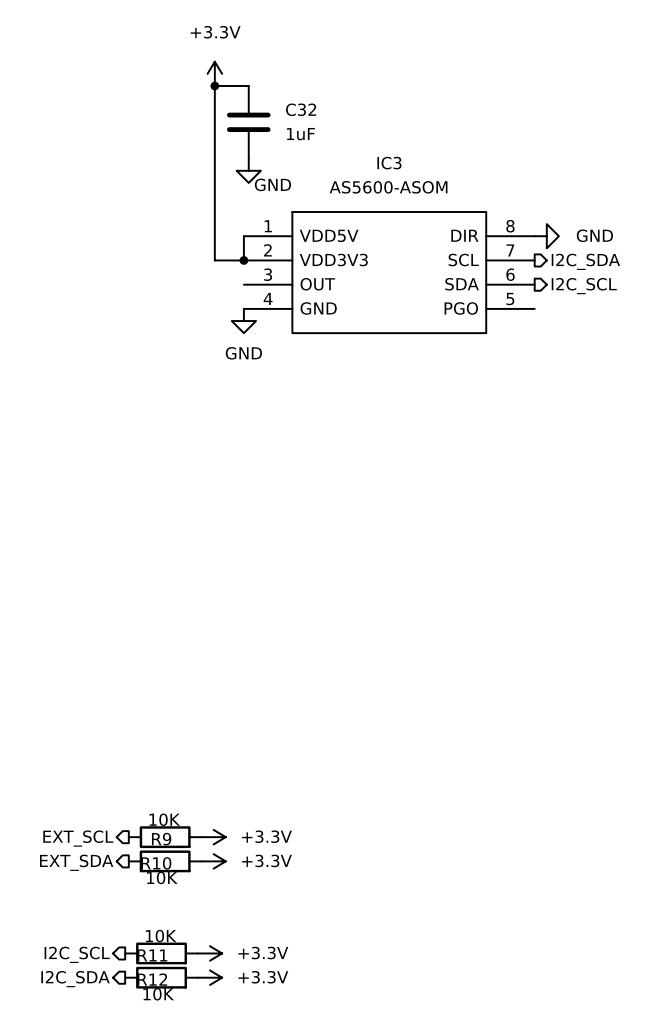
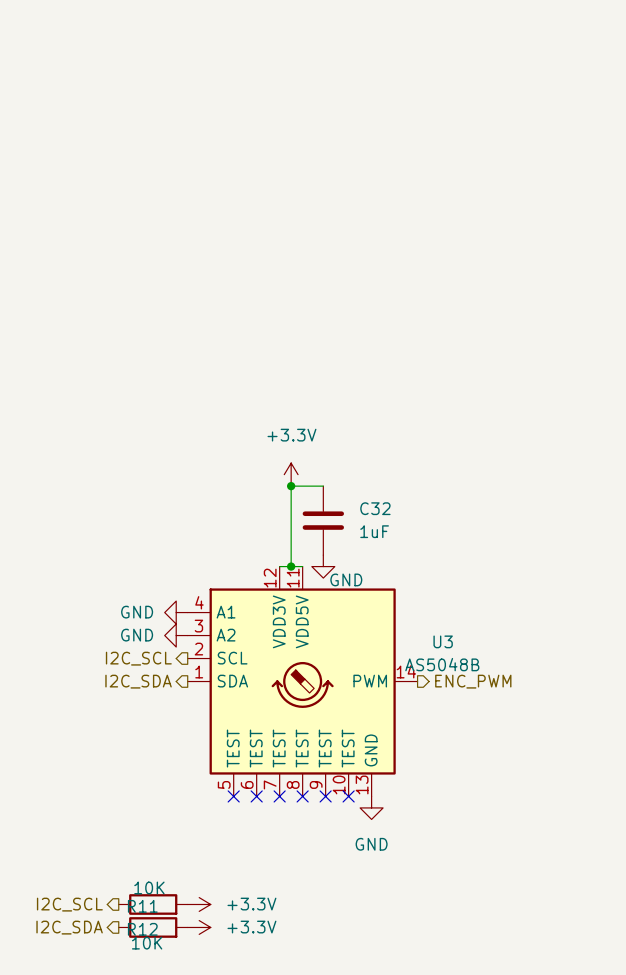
power symbol: +3.3V (214, 73) -> none
junction: (214, 85) -> none
wire: (248, 85) (214, 85) (214, 260) (243, 260) (243, 236) -> none
C32 position: (248, 122) -> (323, 520)
power symbol: GND (248, 170) -> none
power symbol: GND (546, 236) -> none
junction: (243, 260) -> none
hierarchical label: I2C_SDA (585, 261) -> none
IC3: AS5600-ASOM (389, 272) -> none
hierarchical label: I2C_SCL (584, 286) -> none
power symbol: GND (243, 321) -> none
power symbol: none -> +3.3V (291, 474)
junction: none -> (291, 486)
wire: none -> (323, 486) (291, 486) (291, 566)
wire: none -> (279, 566) (302, 566)
junction: none -> (291, 566)
power symbol: none -> GND (323, 566)
power symbol: none -> GND (176, 612)
power symbol: none -> GND (176, 635)
hierarchical label: none -> I2C_SCL (138, 658)
U3: none -> AS5048B (302, 681)
hierarchical label: none -> I2C_SDA (138, 681)
hierarchical label: none -> ENC_PWM (473, 681)
R9: 10K (165, 837) -> none
power symbol: +3.3V (213, 837) -> none
hierarchical label: EXT_SCL (78, 838) -> none
no-connect mark: none -> (233, 796)
no-connect mark: none -> (256, 796)
no-connect mark: none -> (279, 796)
no-connect mark: none -> (302, 796)
no-connect mark: none -> (325, 796)
no-connect mark: none -> (348, 796)
power symbol: none -> GND (371, 807)
R10: 10K (165, 861) -> none
power symbol: +3.3V (213, 861) -> none
hierarchical label: EXT_SDA (76, 862) -> none

